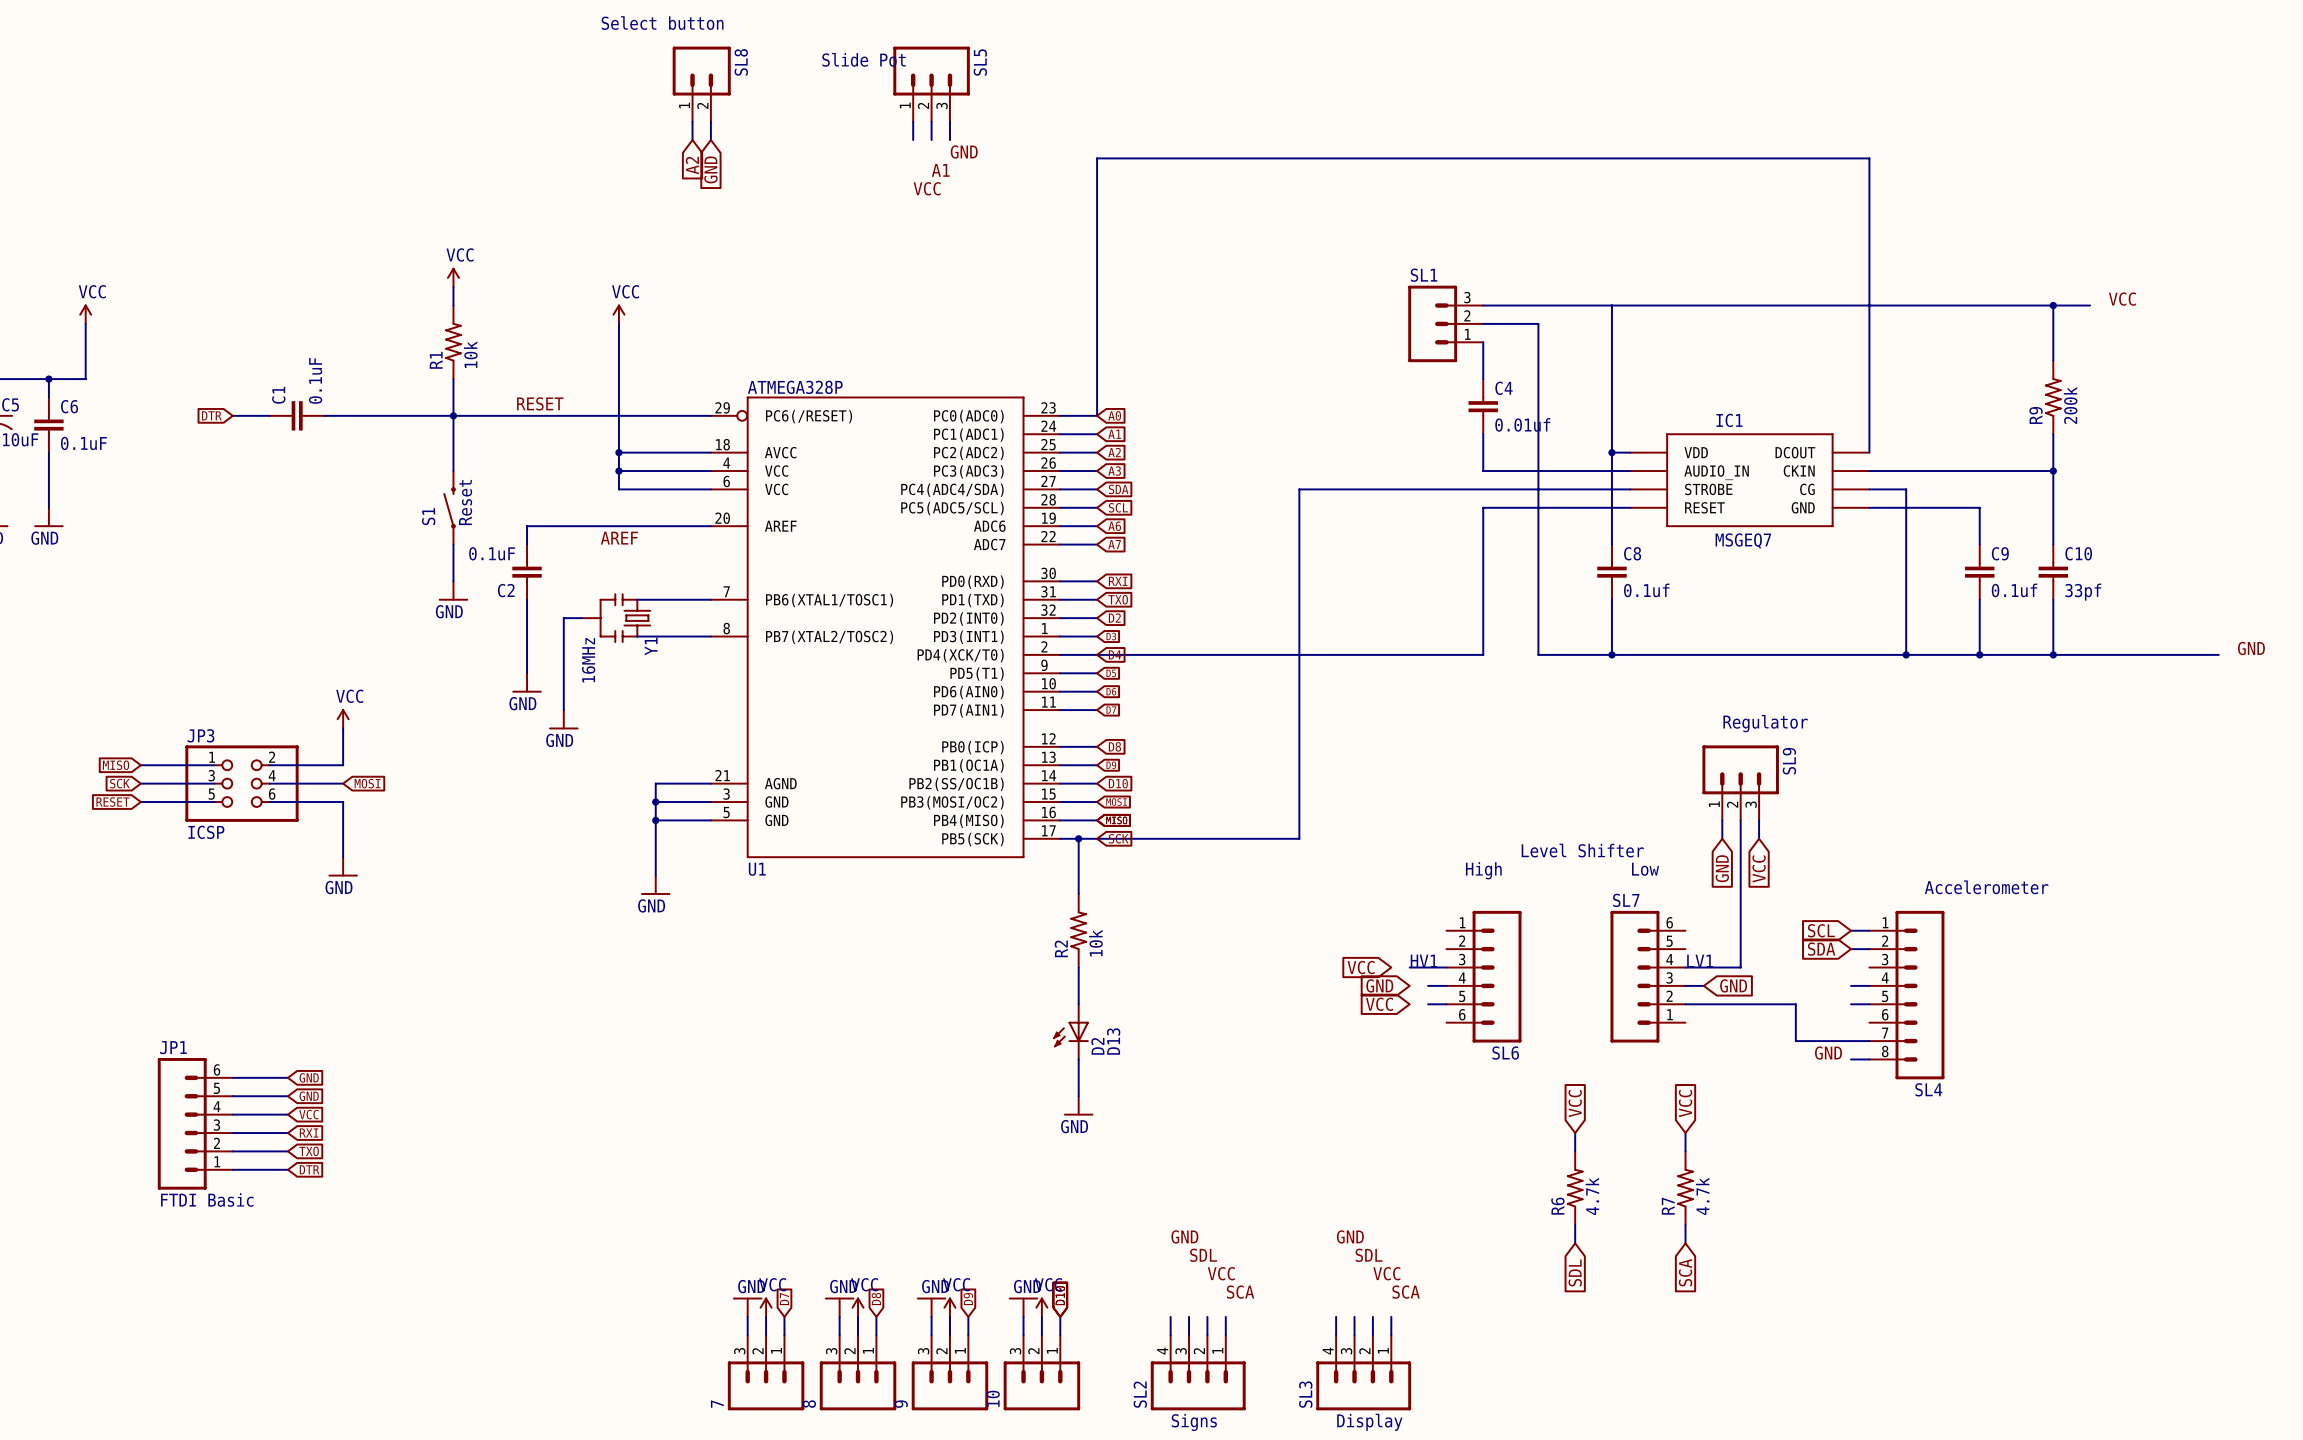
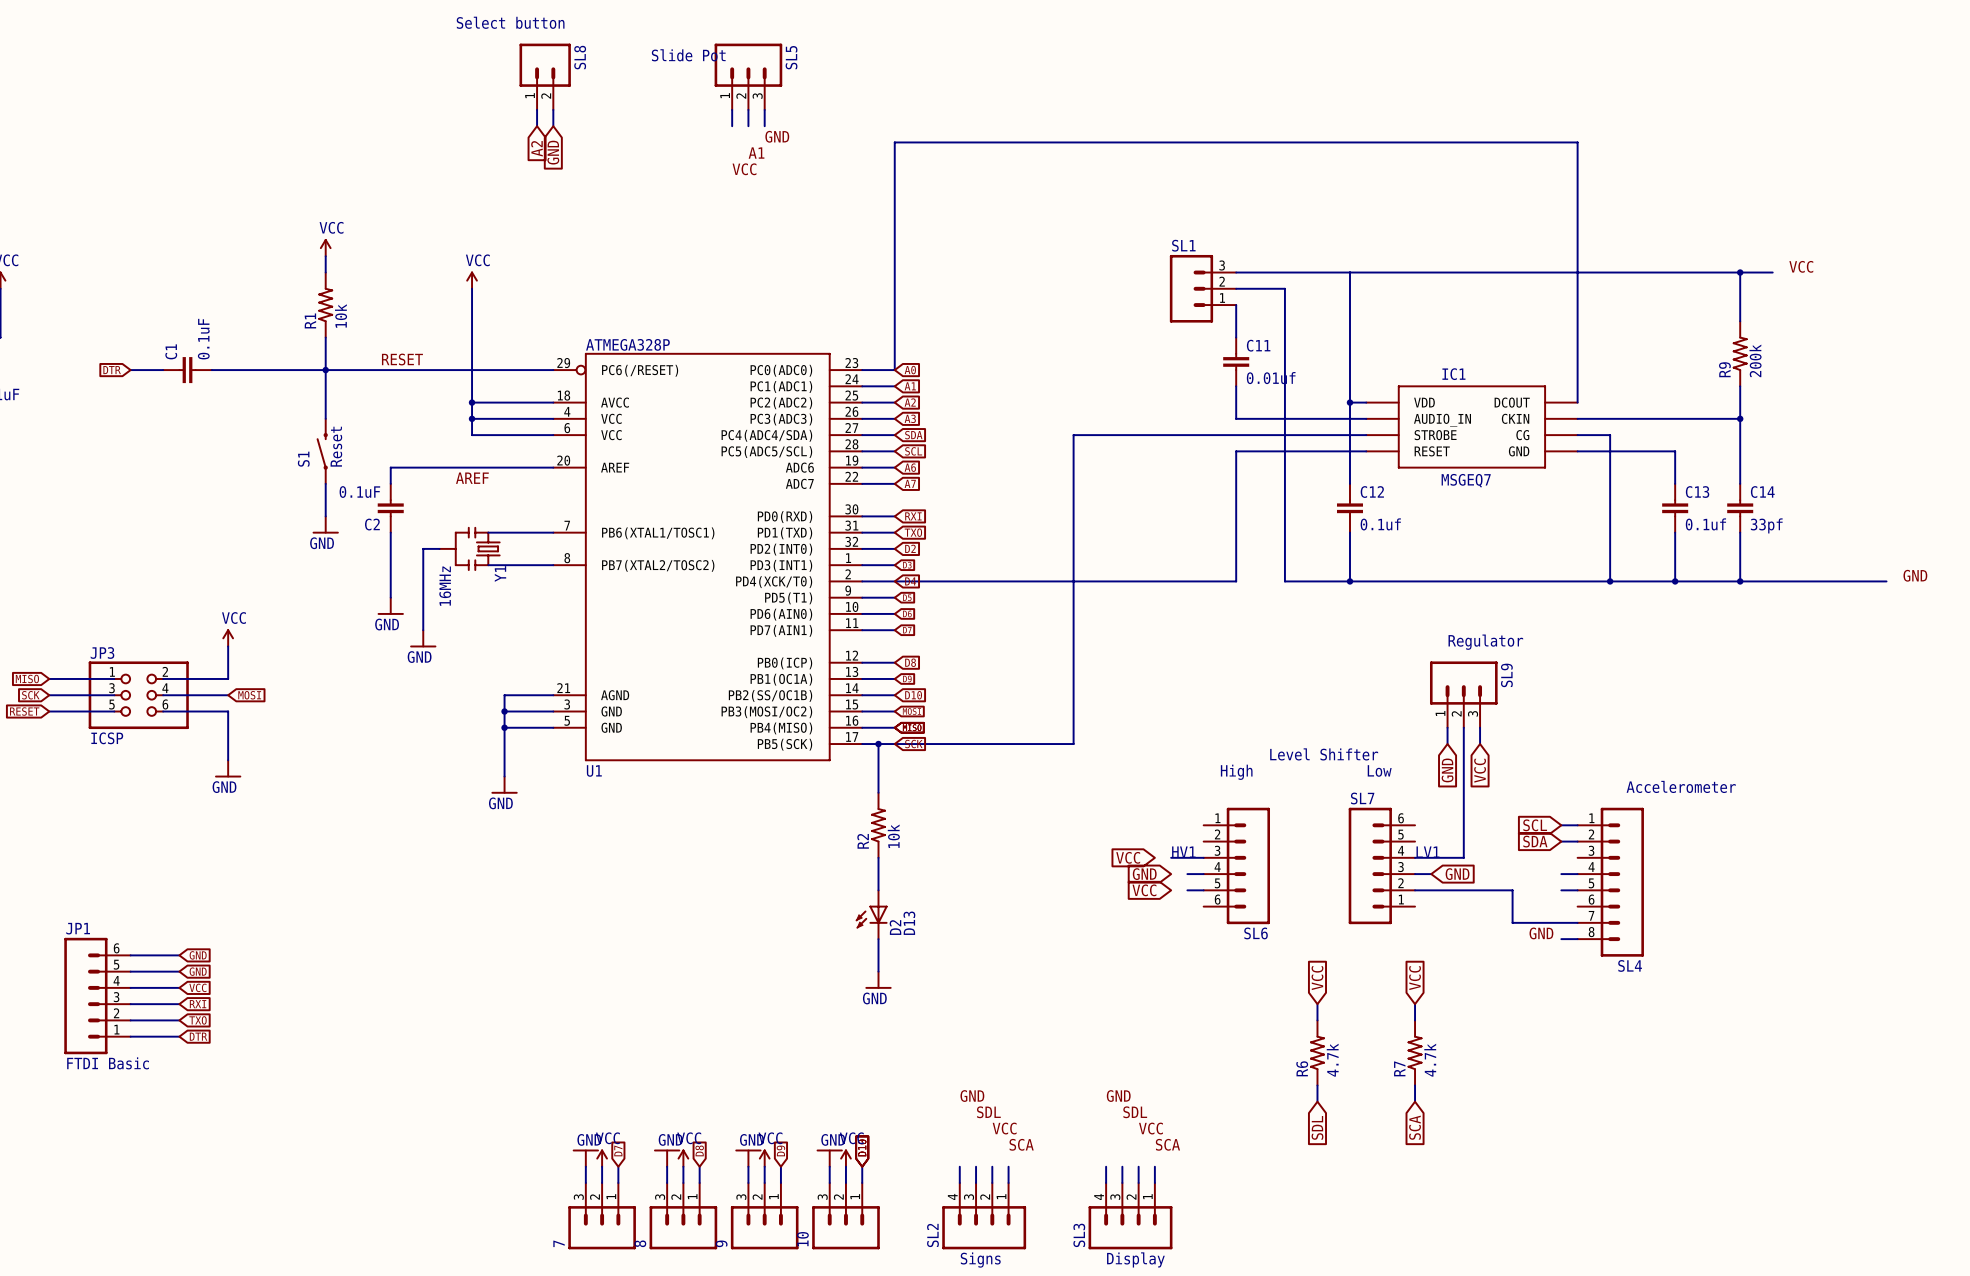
C4 name: C4 (1504, 388) -> C11 (1258, 345)
C8 name: C8 (1632, 553) -> C12 (1372, 492)
C9 name: C9 (2000, 553) -> C13 (1697, 492)
C10 name: C10 (2078, 553) -> C14 (1762, 492)

